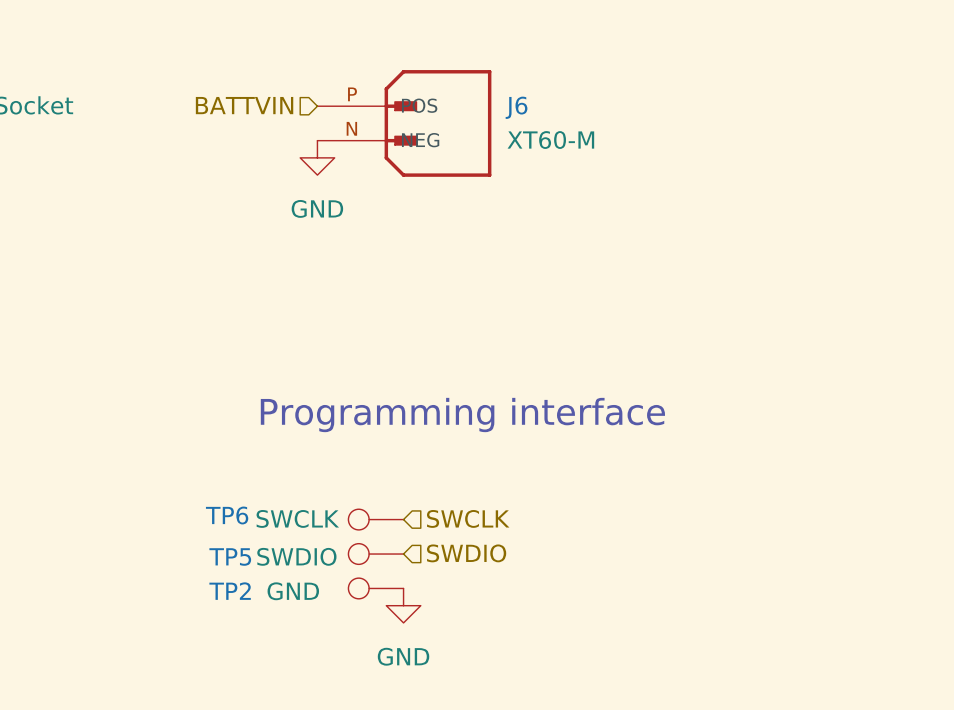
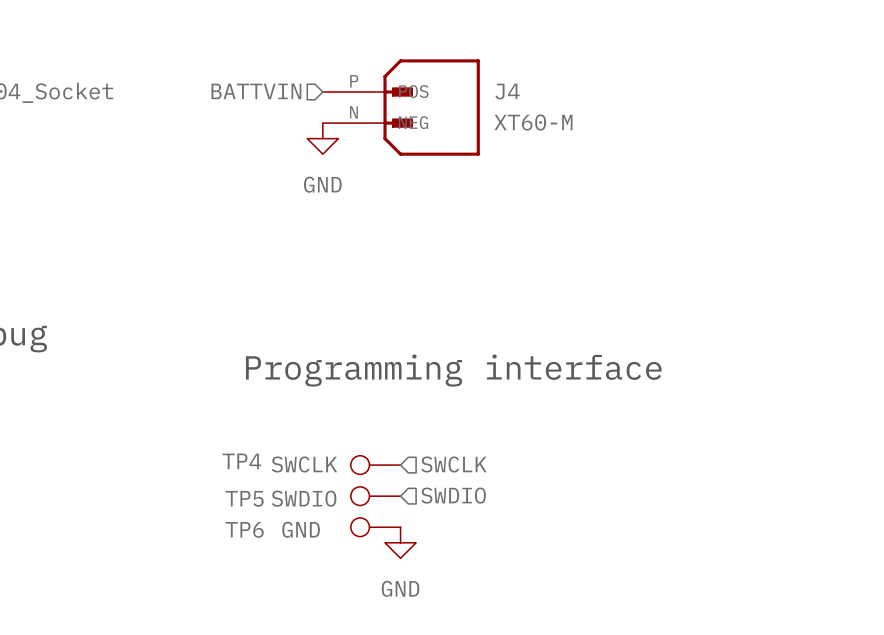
J6 name: J6 (516, 107) -> J4 (507, 91)
TP6 name: TP6 (227, 515) -> TP4 (241, 461)
TP2 name: TP2 (230, 591) -> TP6 (244, 529)

